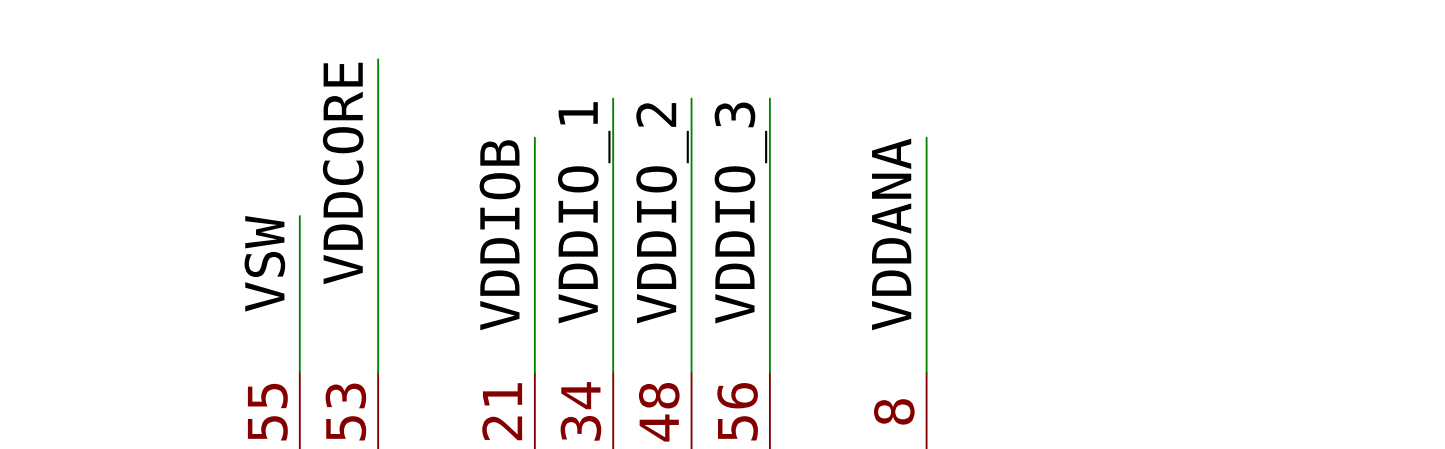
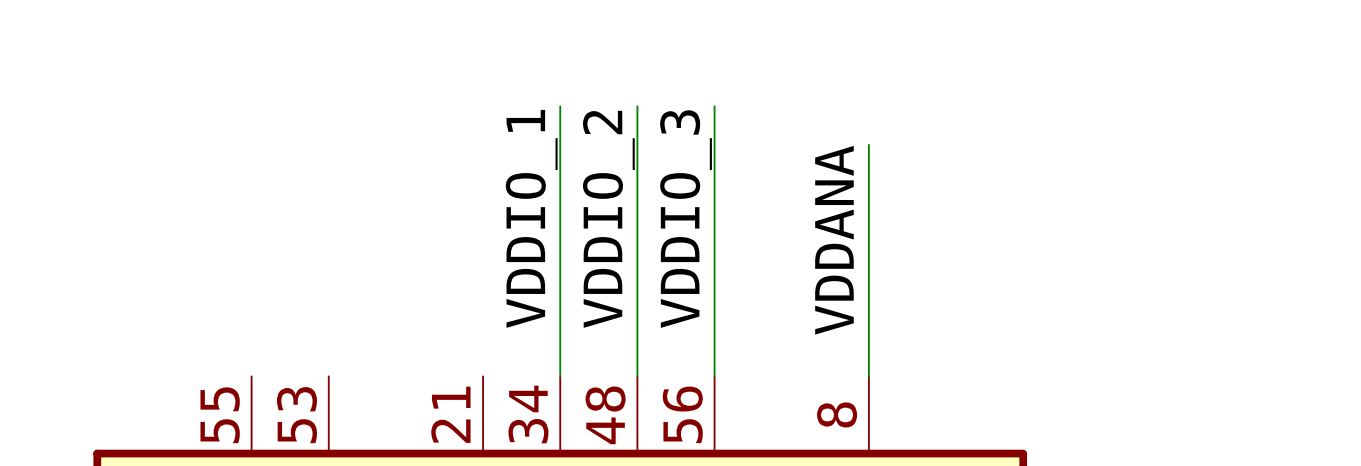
wire: (378, 59) (378, 372) -> none
wire: (534, 137) (534, 372) -> none
label: VDDCORE (343, 173) -> none
wire: (299, 216) (299, 372) -> none
label: VDDIOB (499, 235) -> none
label: VSW (264, 263) -> none

